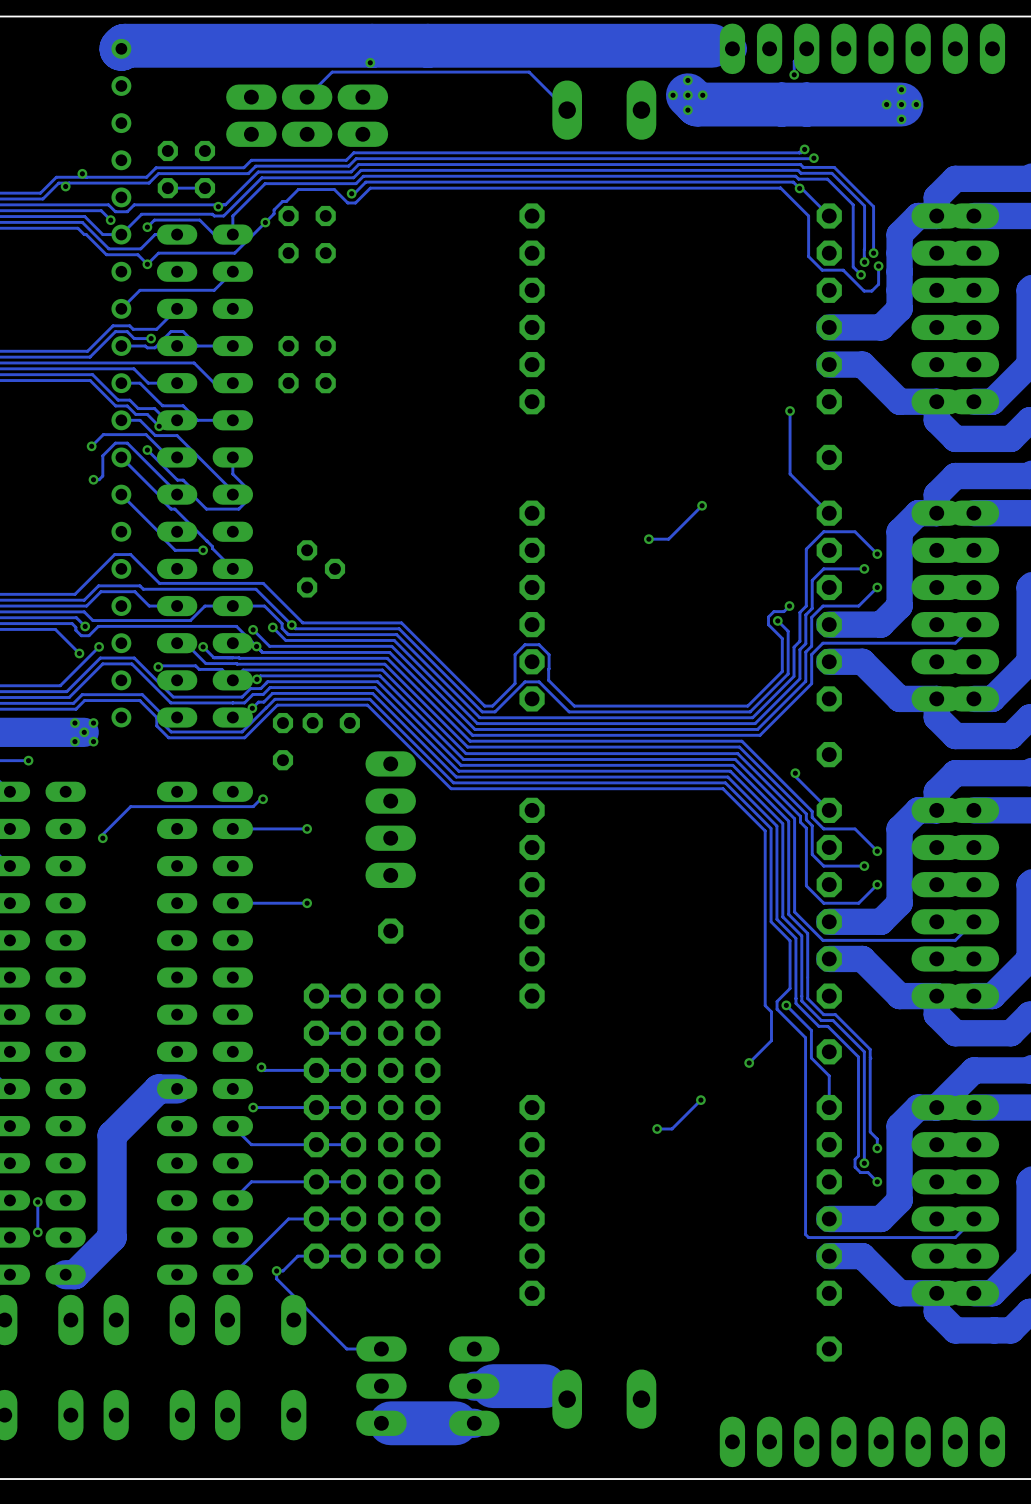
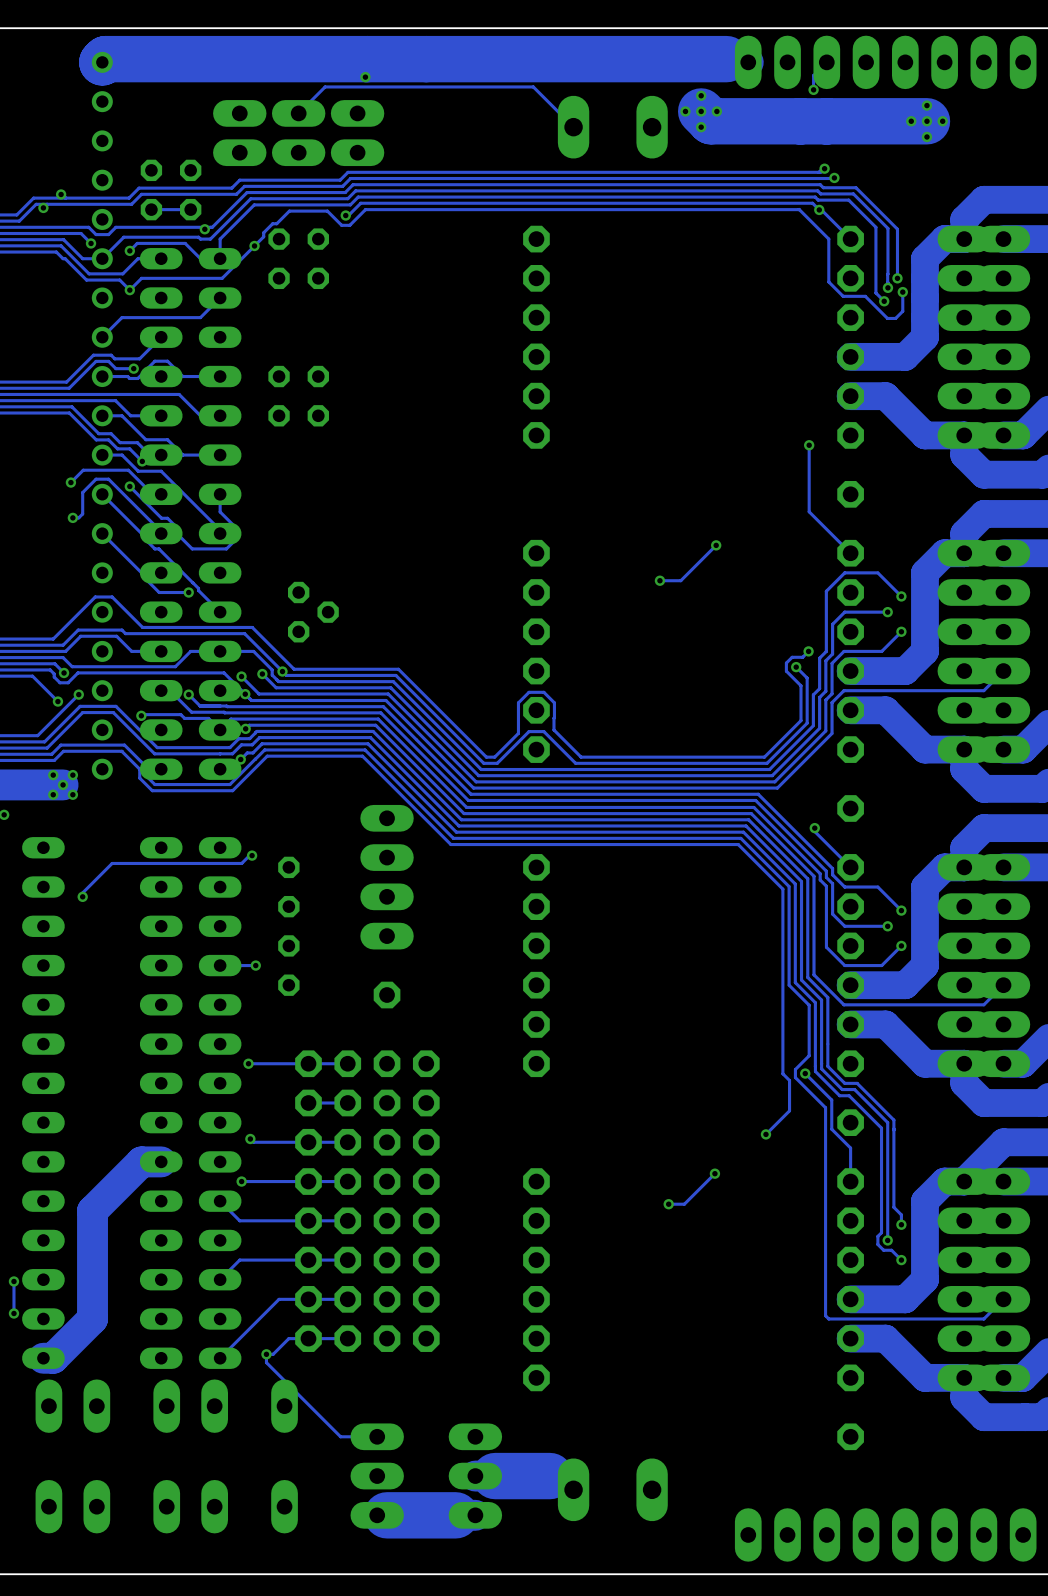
part: (331, 723) -> none
part: (282, 741) -> none
part: none -> (288, 887)
track: (307, 828) (232, 828) -> none
via: (307, 828) -> none
part: none -> (288, 965)
track: (307, 903) (266, 903) -> none
via position: (307, 903) -> (255, 965)
via: none -> (248, 1063)
track: none -> (308, 1063) (248, 1063)

